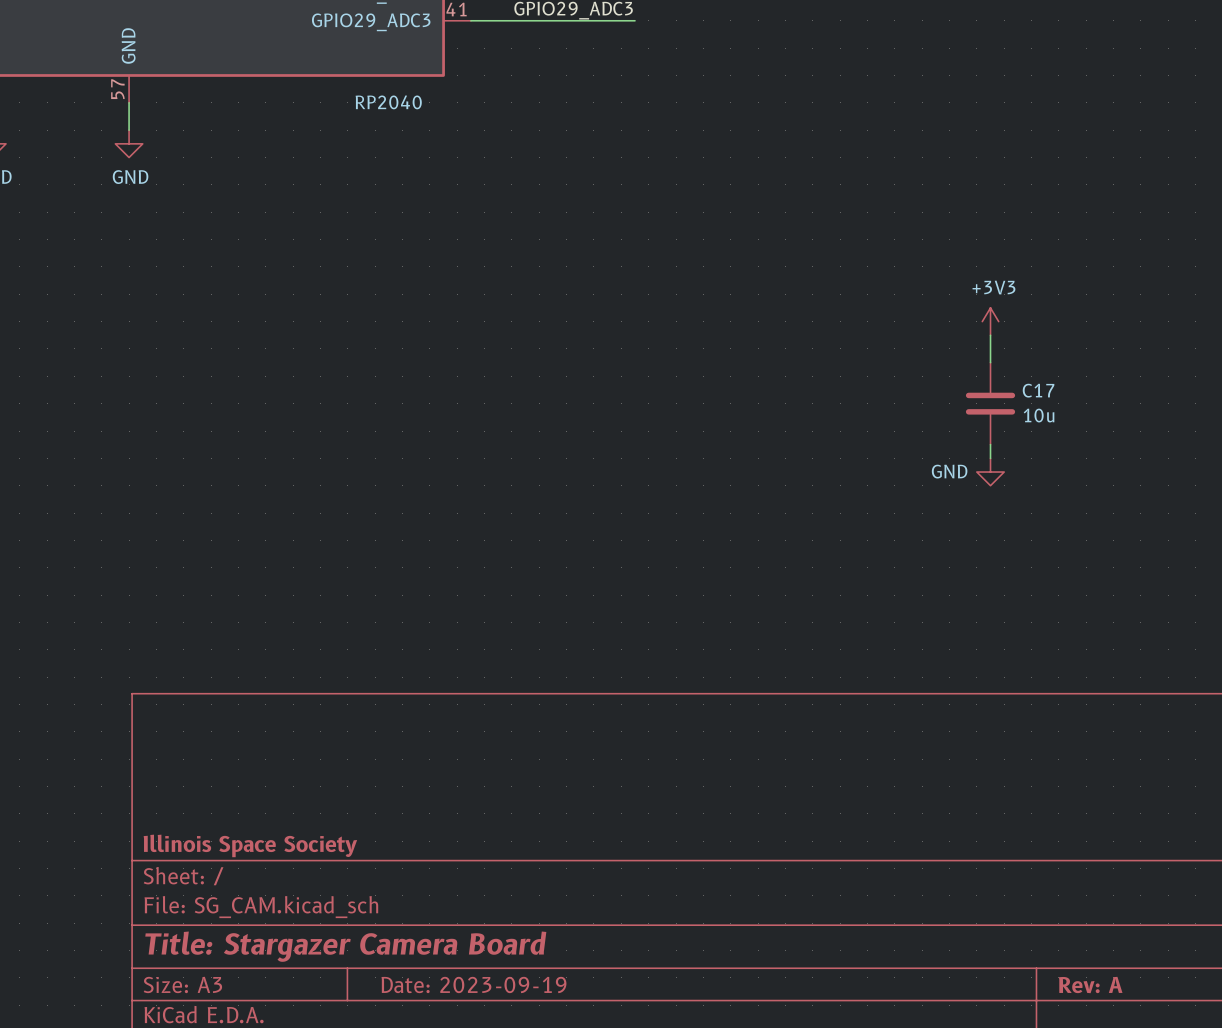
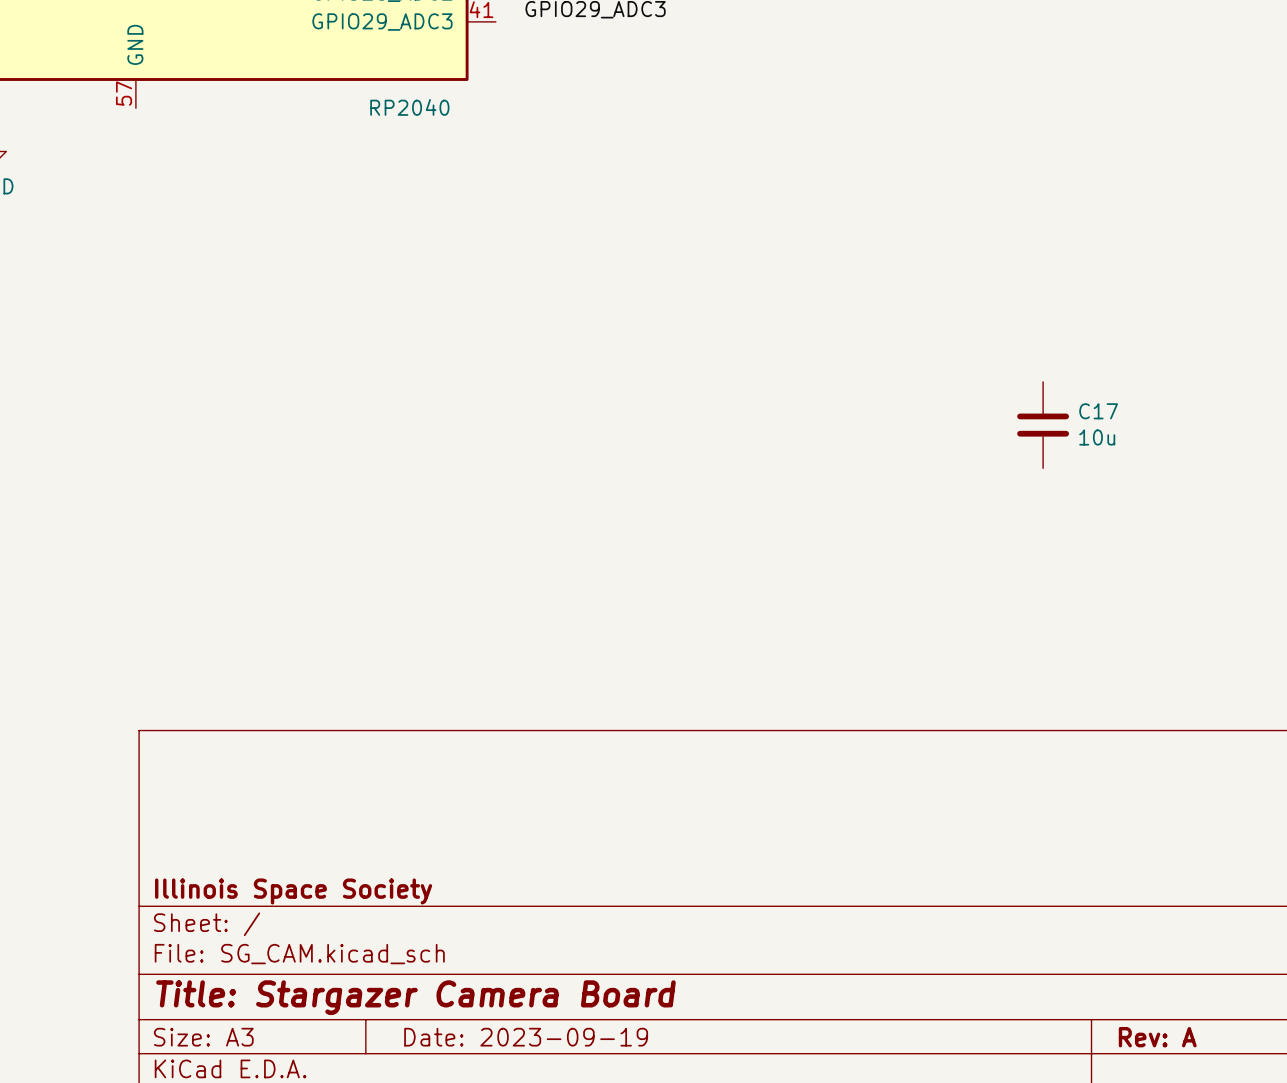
wire: (470, 20) (634, 20) -> none
wire: (129, 102) (129, 130) -> none
power symbol: GND (129, 143) -> none
power symbol: +3V3 (990, 321) -> none
wire: (990, 335) (990, 362) -> none
wire: (990, 444) (990, 458) -> none
power symbol: GND (990, 472) -> none

